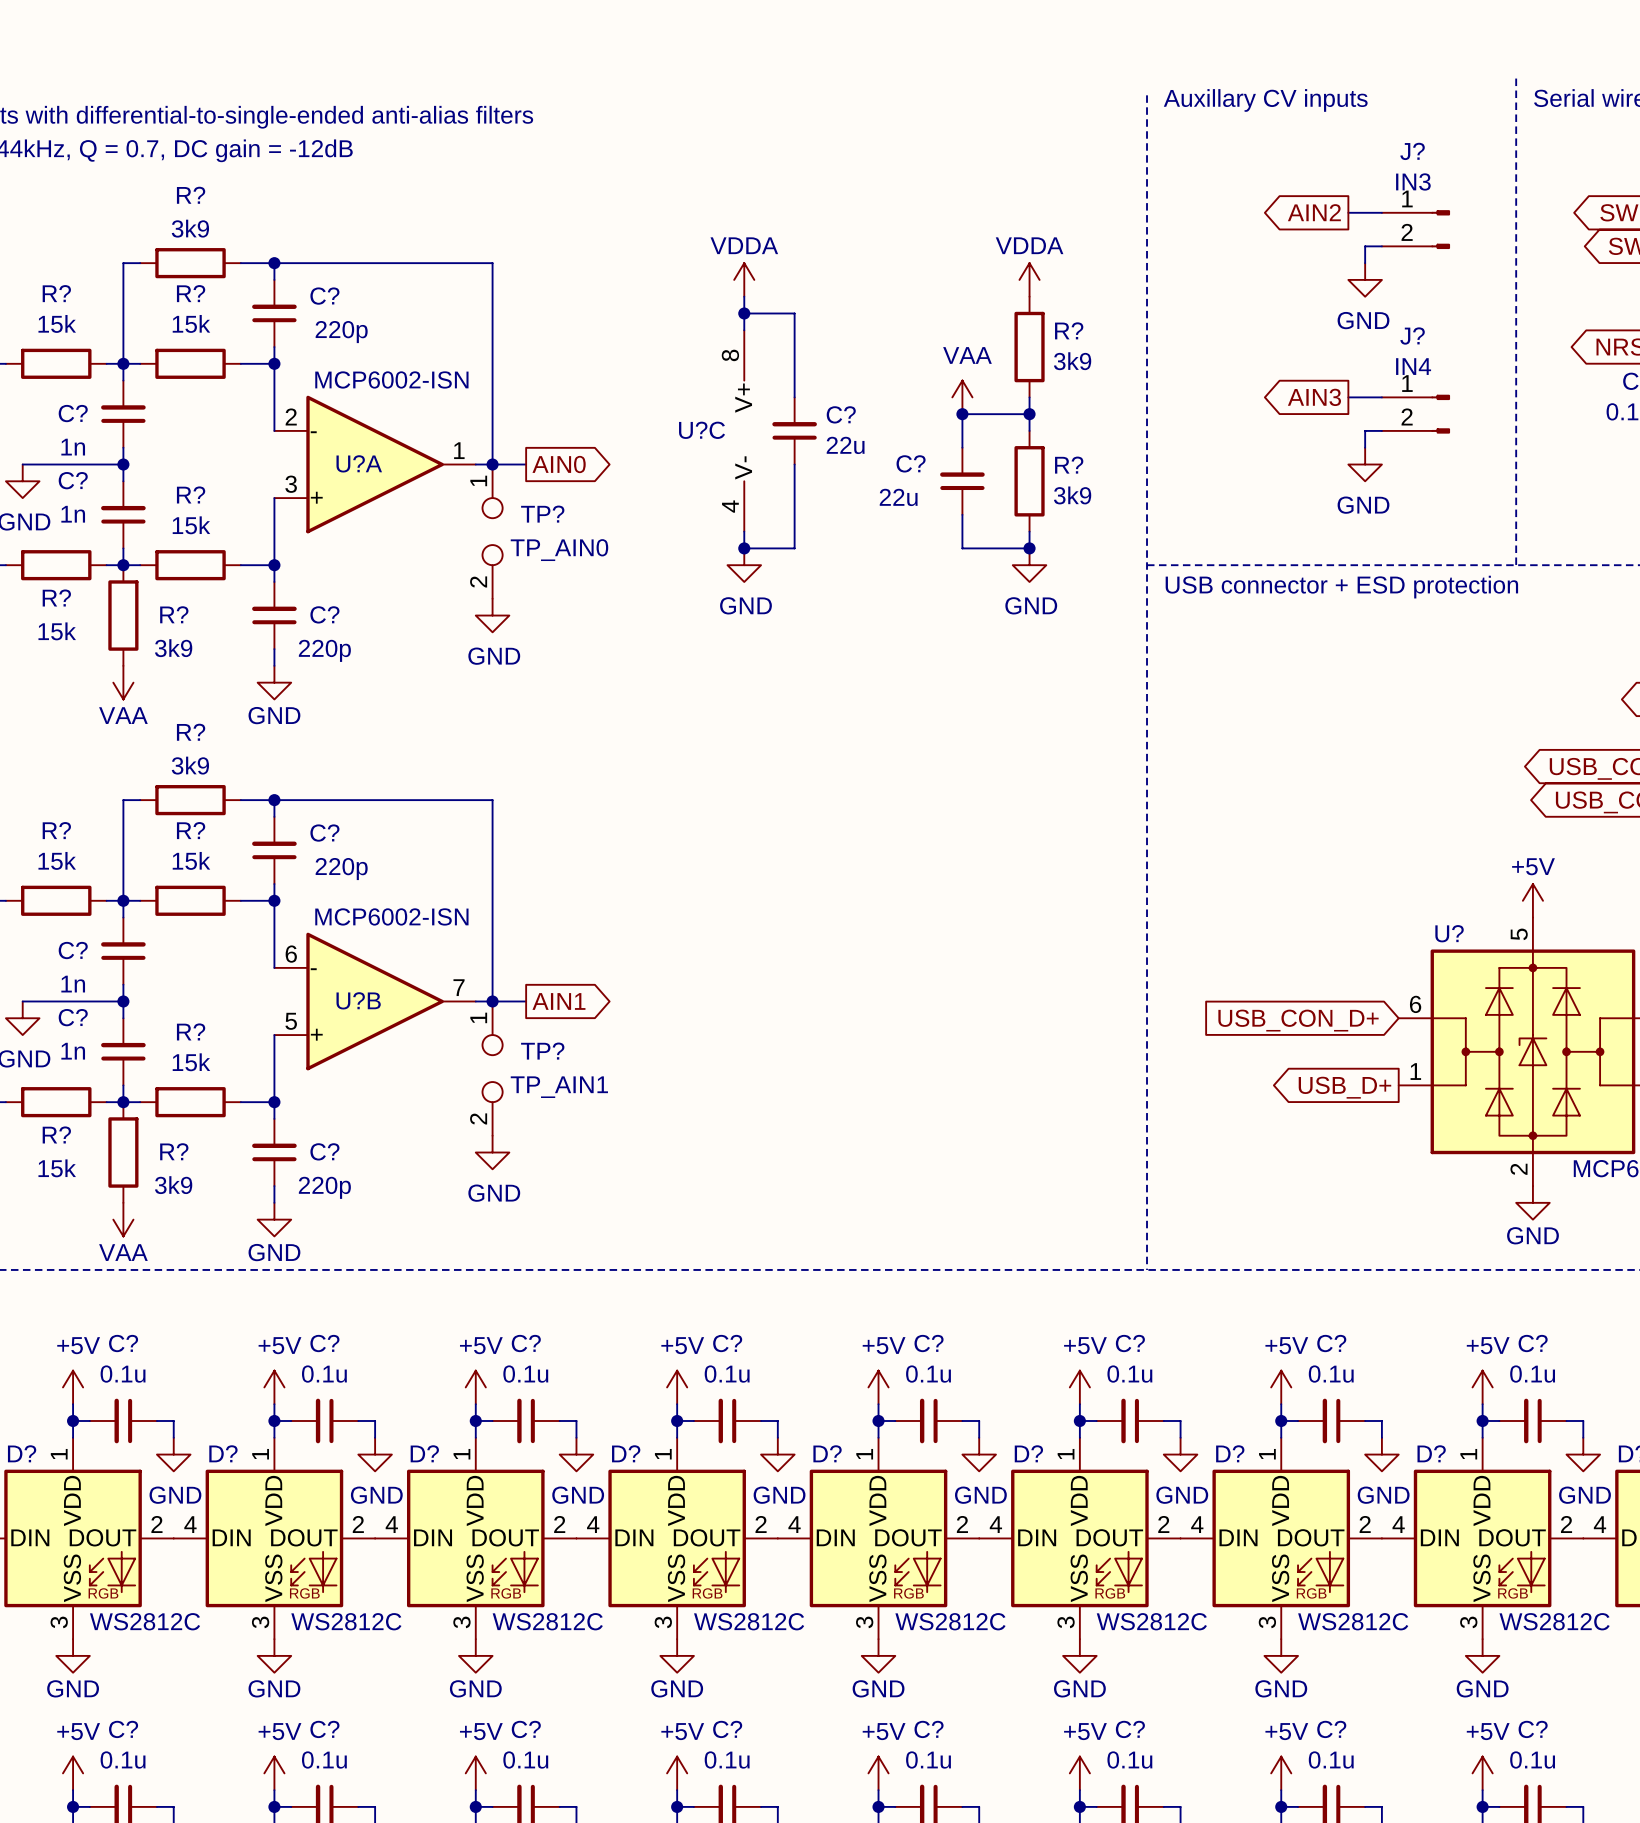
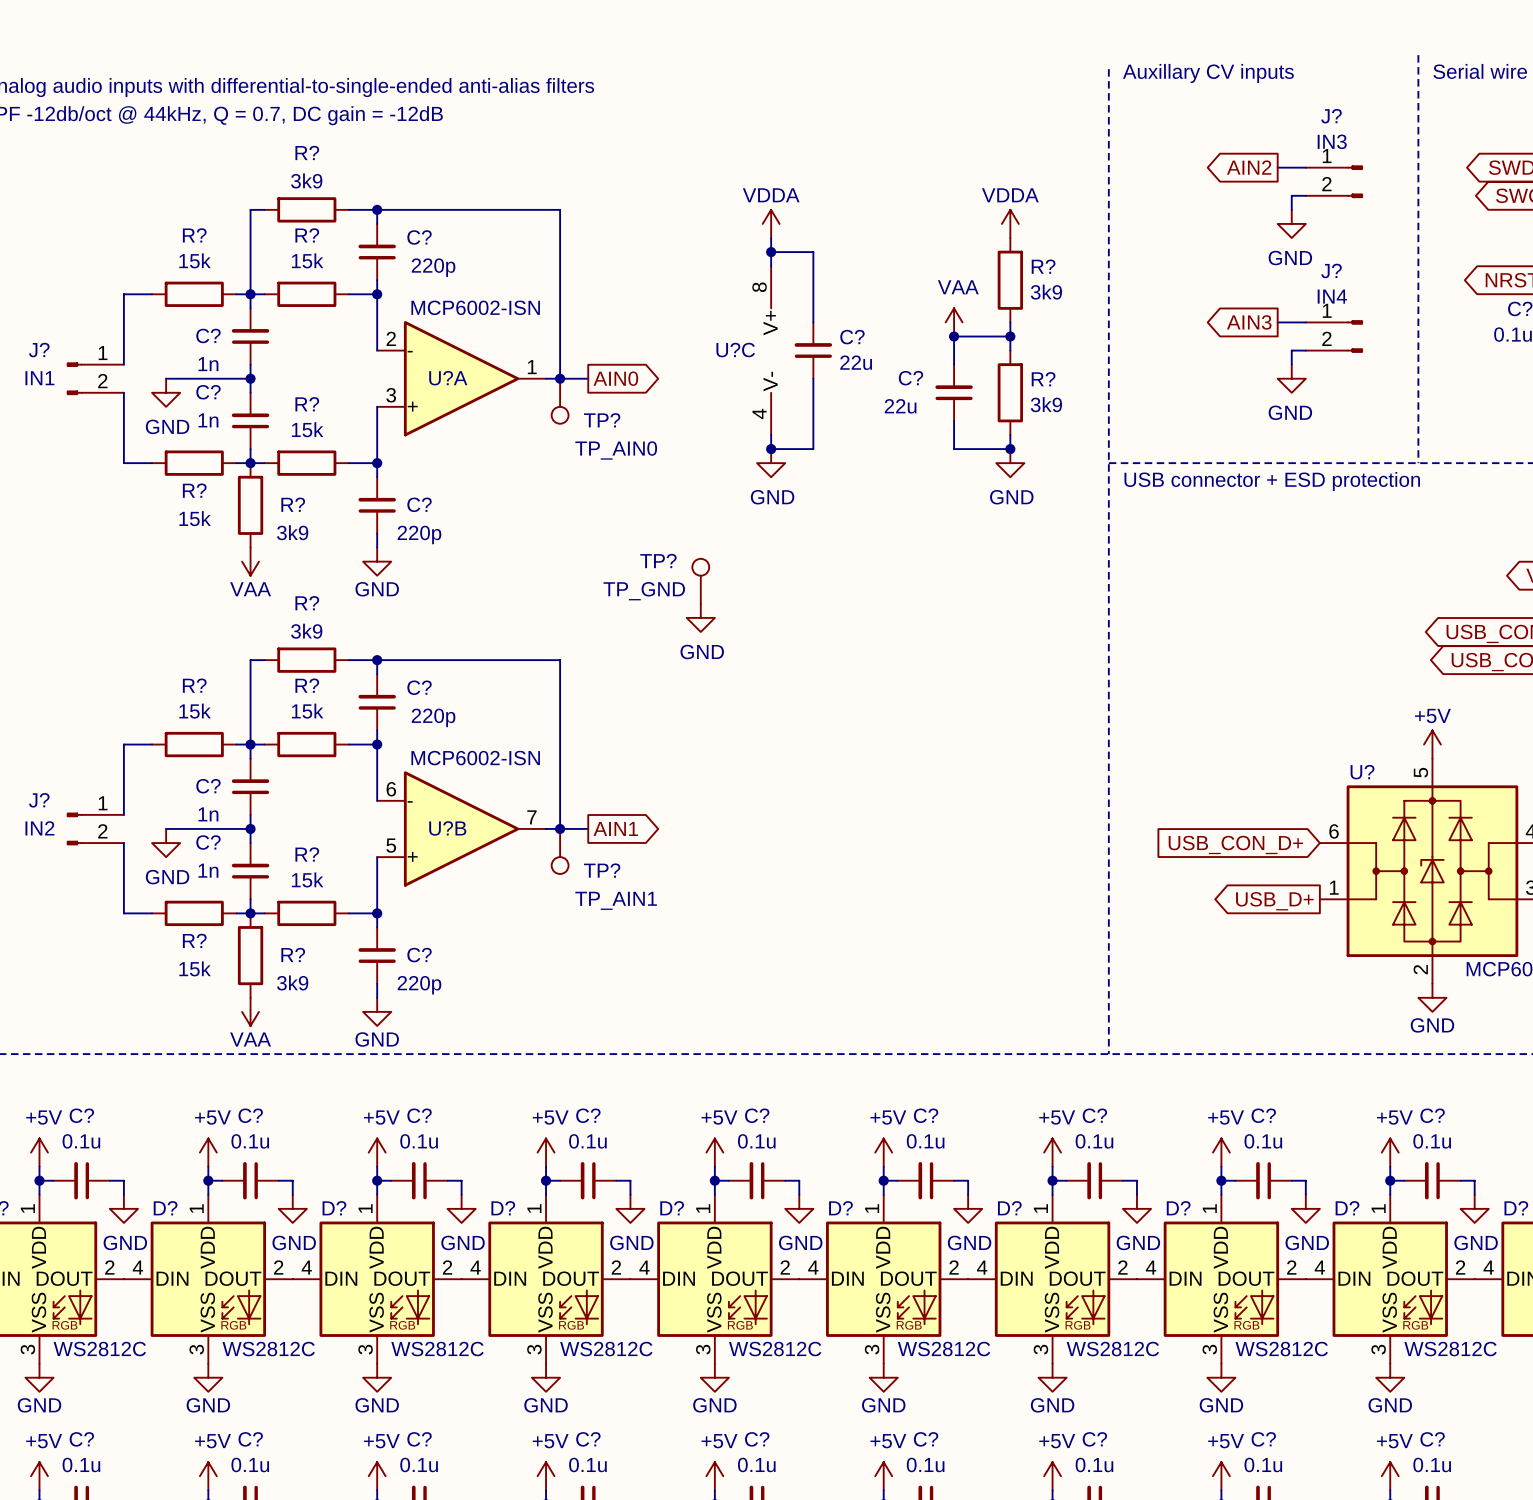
TP?: TP_AIN0 (492, 531) -> none
power symbol position: GND (492, 615) -> GND (700, 617)
TP?: none -> TP_GND (700, 581)
TP?: TP_AIN1 (492, 1068) -> none
power symbol: GND (492, 1152) -> none

